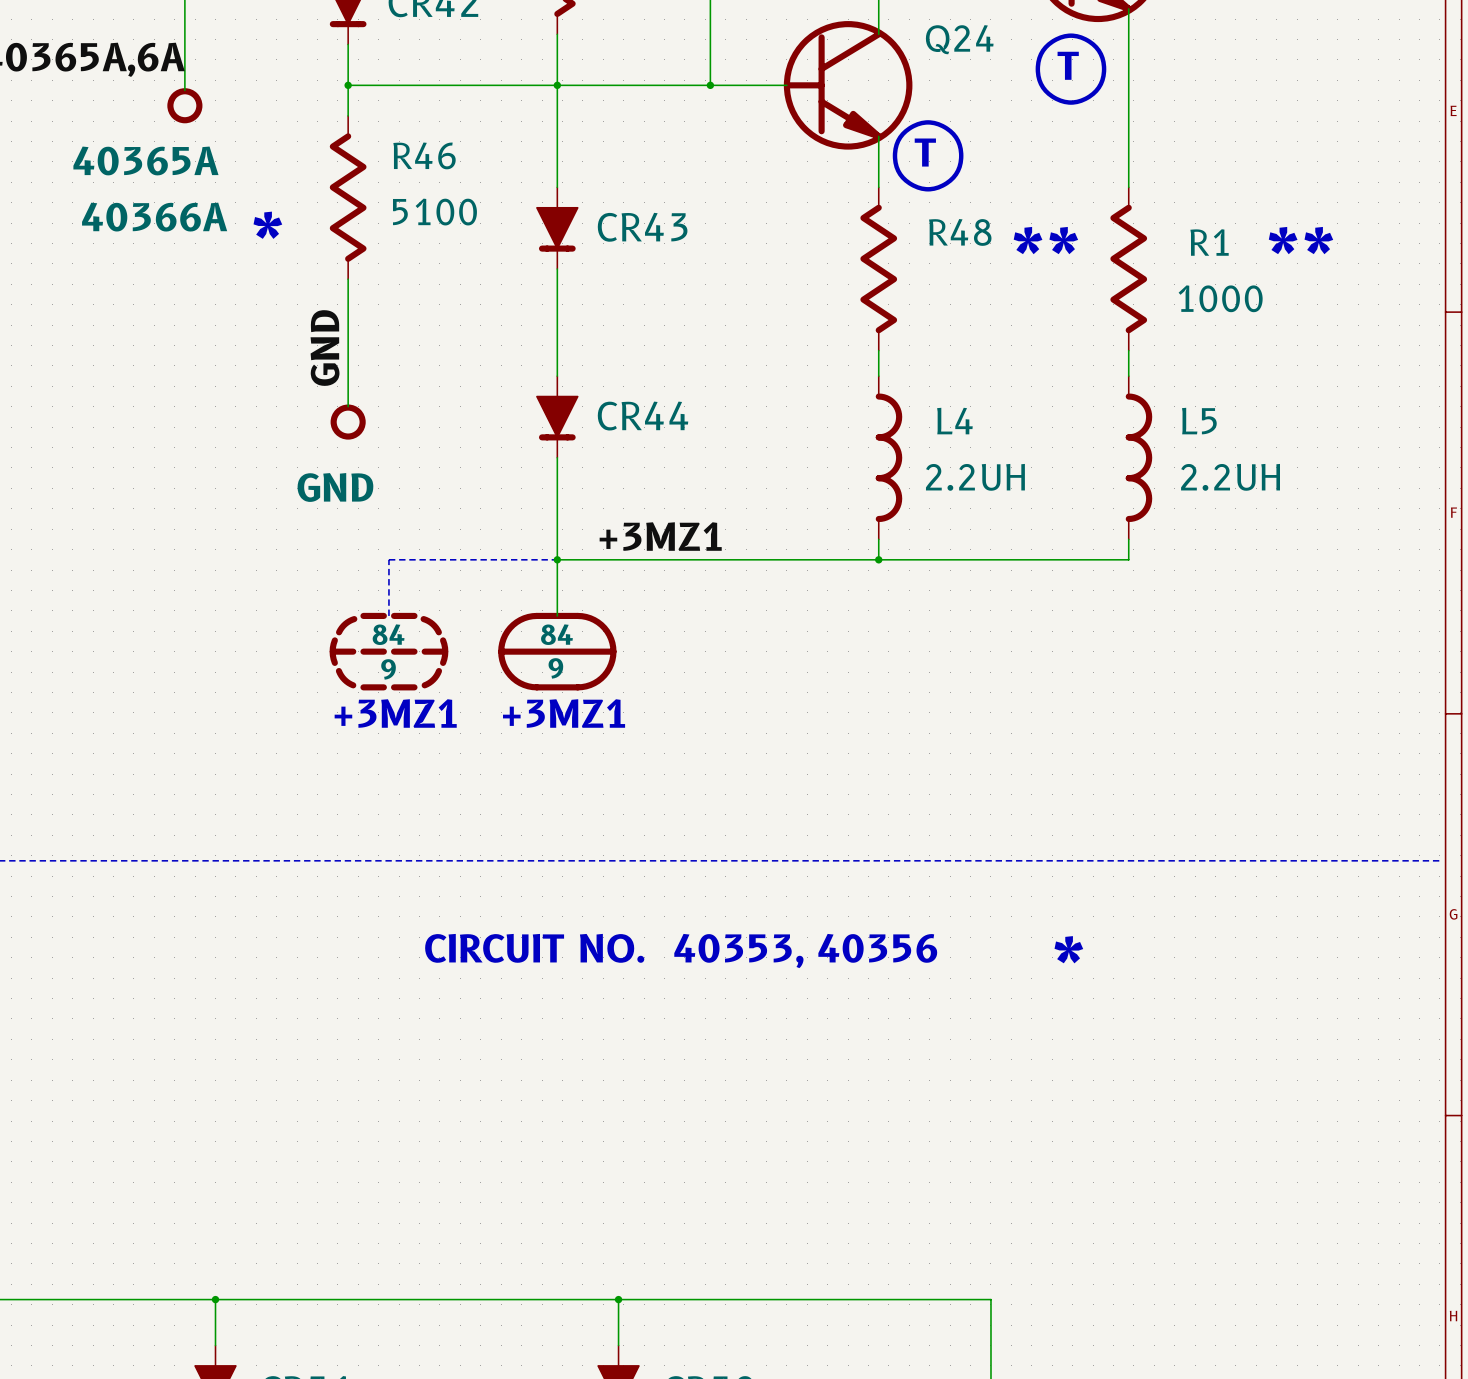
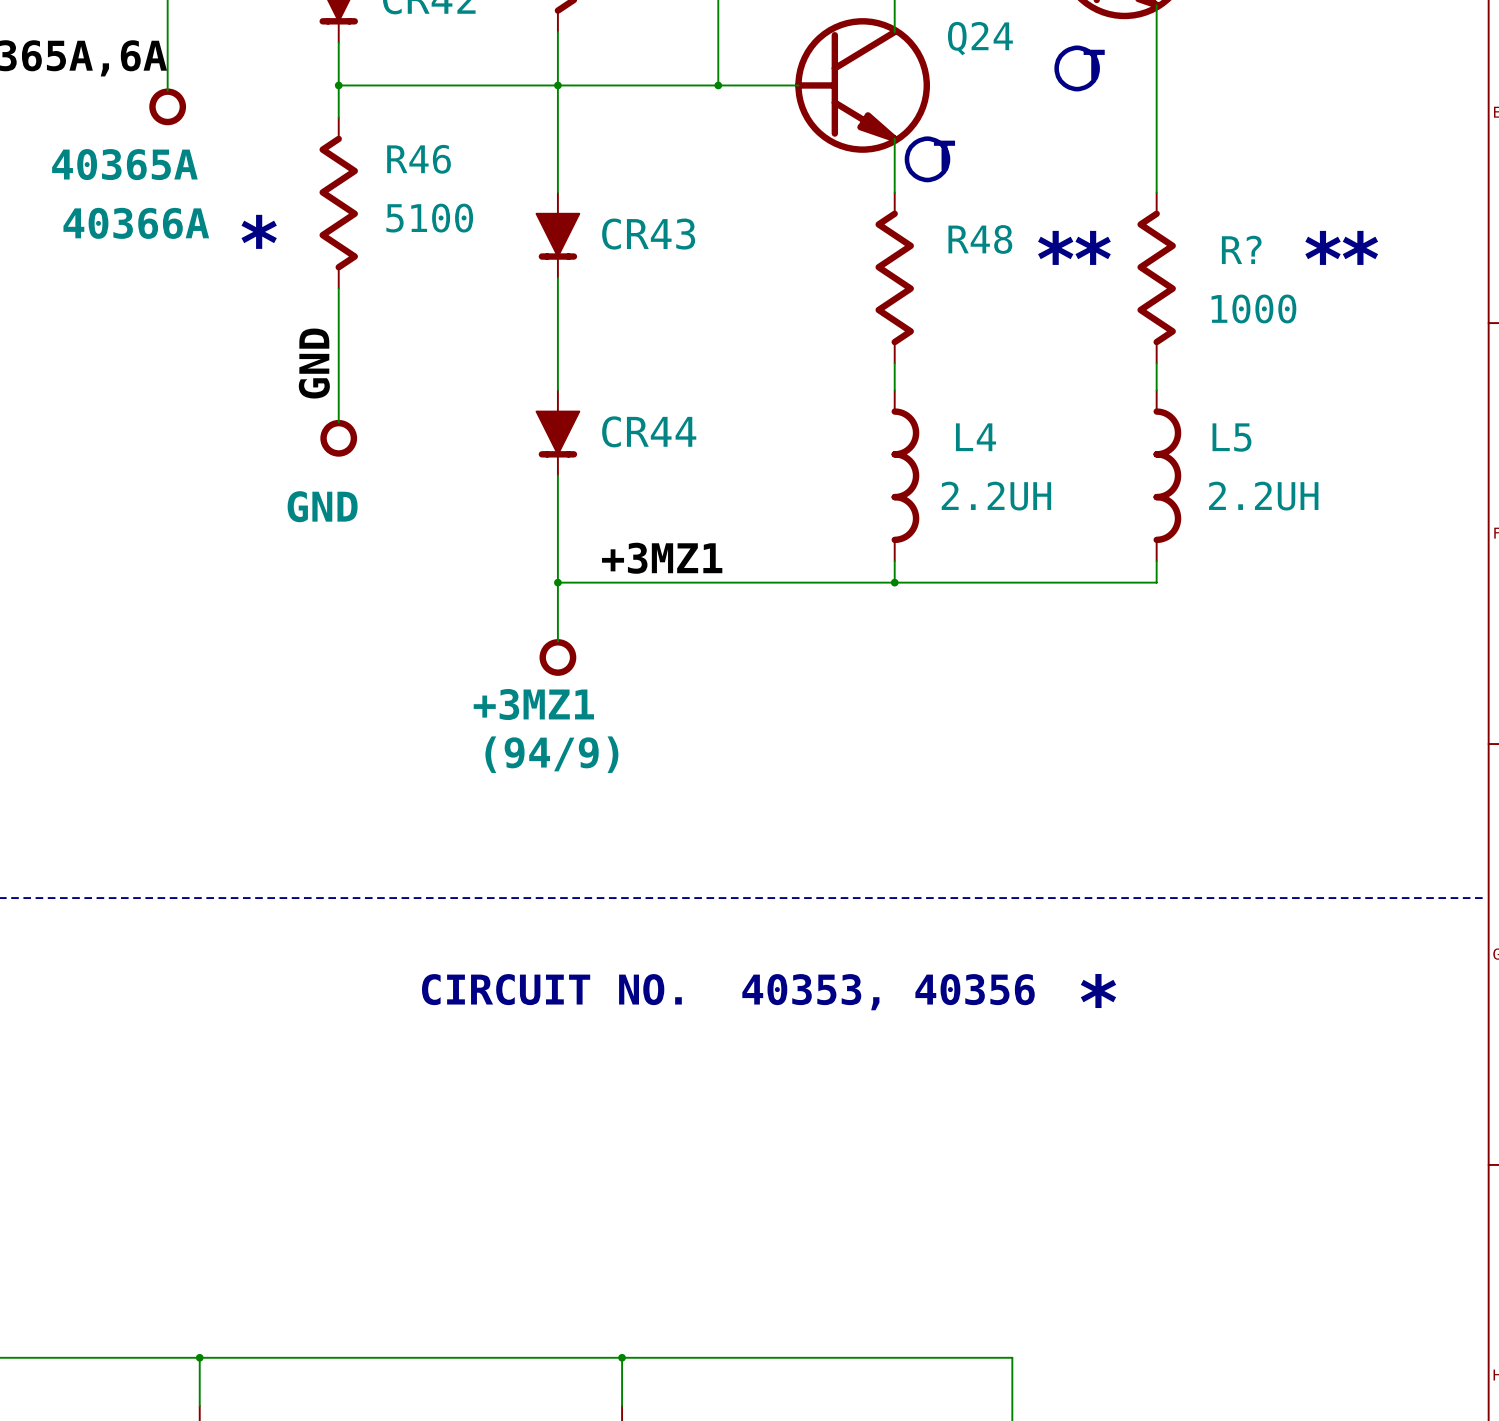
R1 name: R1 (1209, 242) -> R? (1241, 249)
line: (557, 559) (388, 559) (388, 615) -> none
part: none -> (557, 657)
part: (388, 651) -> none
part: (557, 651) -> none
text: +3MZ1 (395, 713) -> none
text: +3MZ1 (564, 713) -> none

